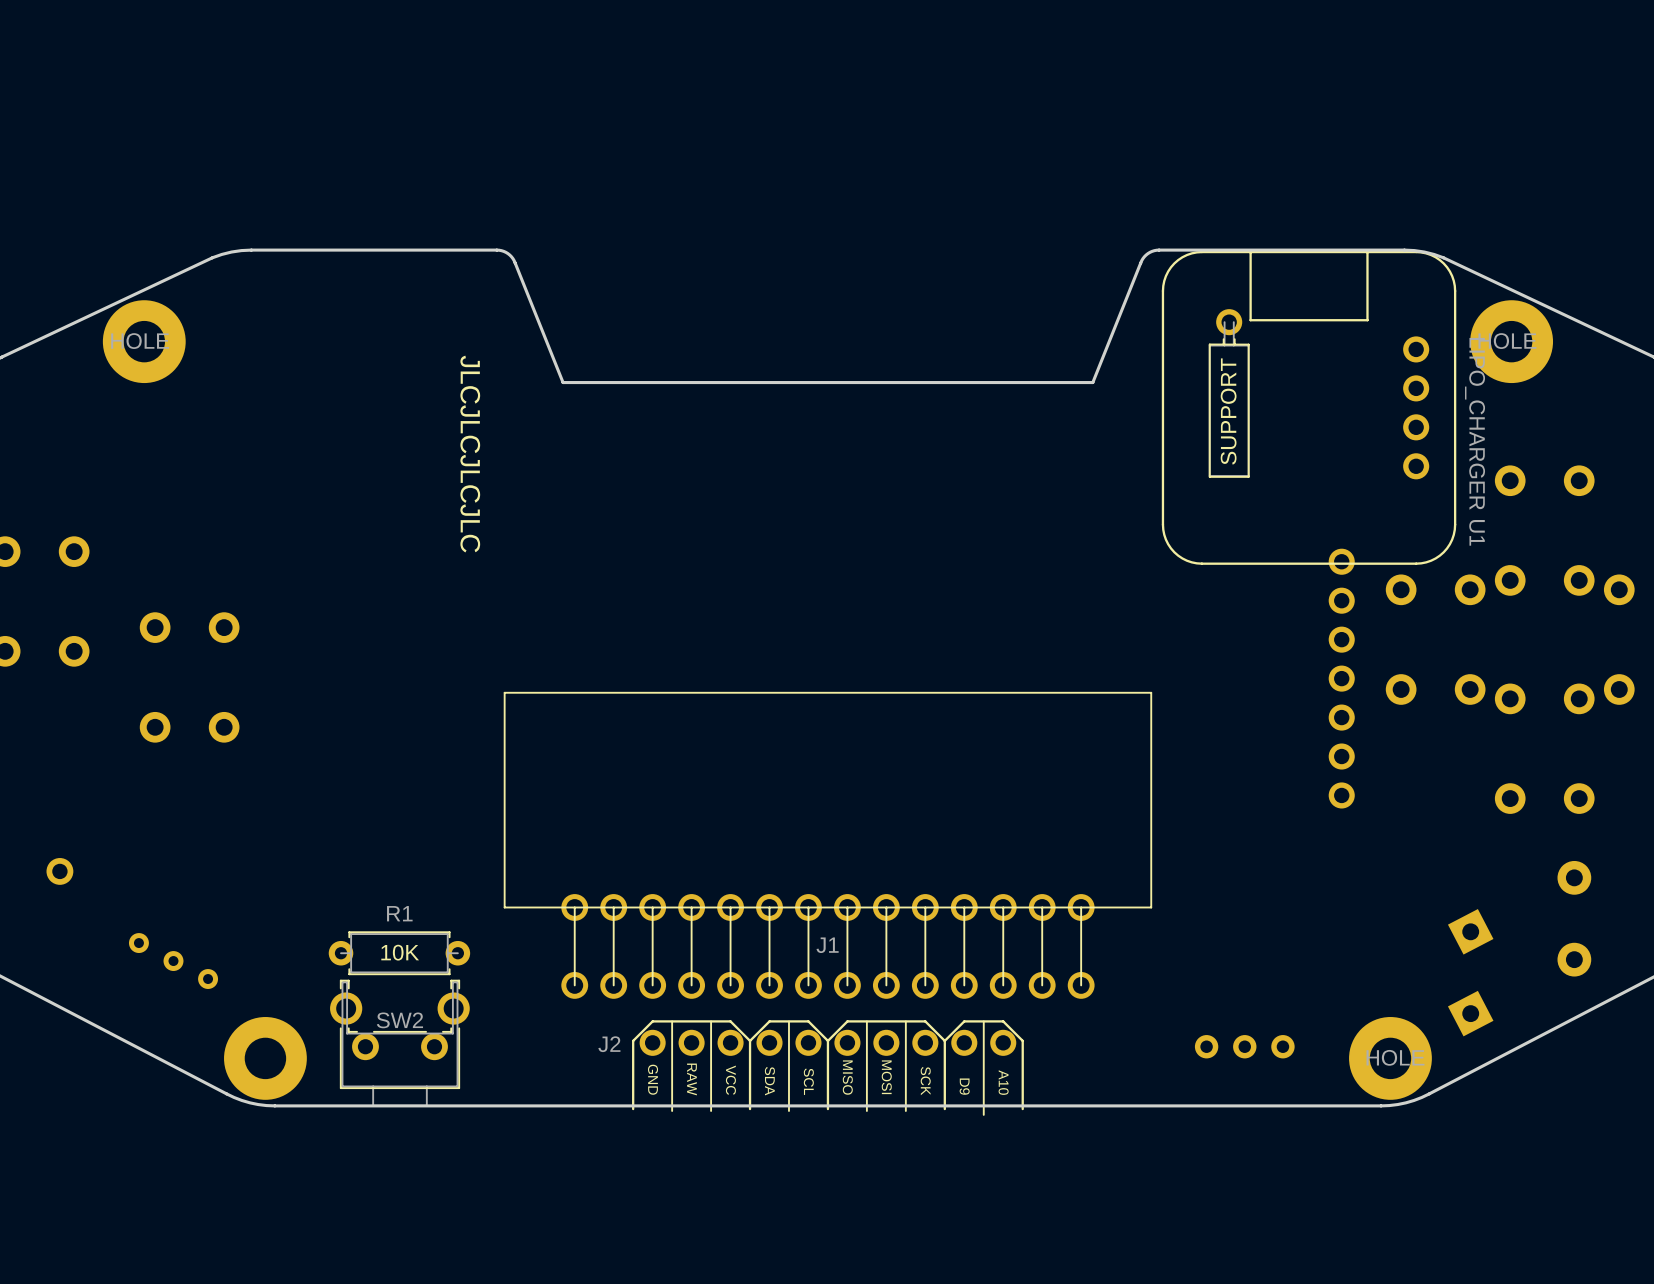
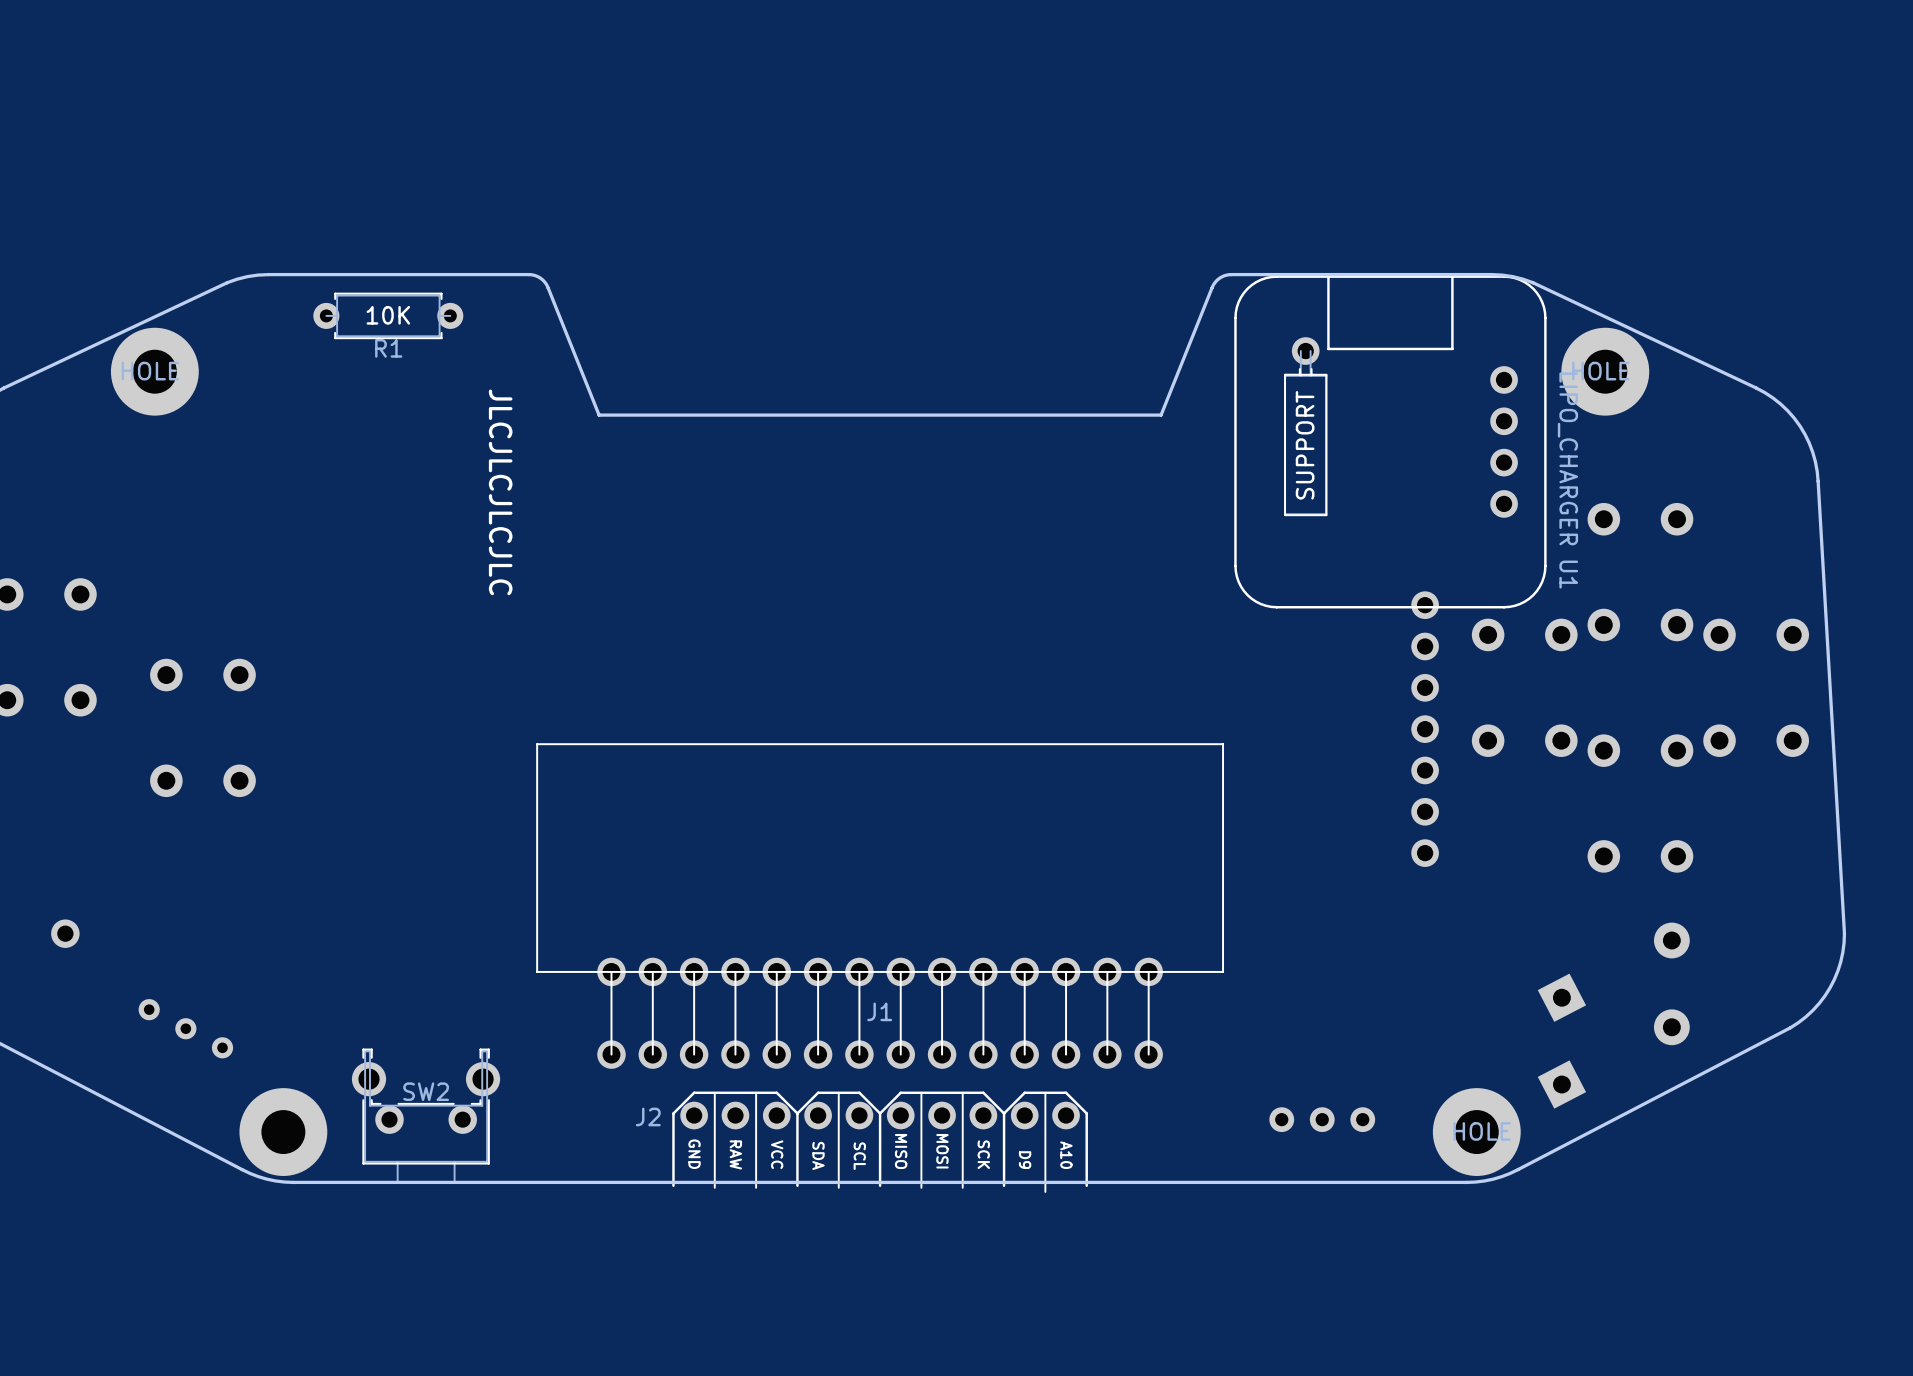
R1 name position: R1 (399, 913) -> R1 (388, 348)
R1 position: (399, 953) -> (388, 315)

